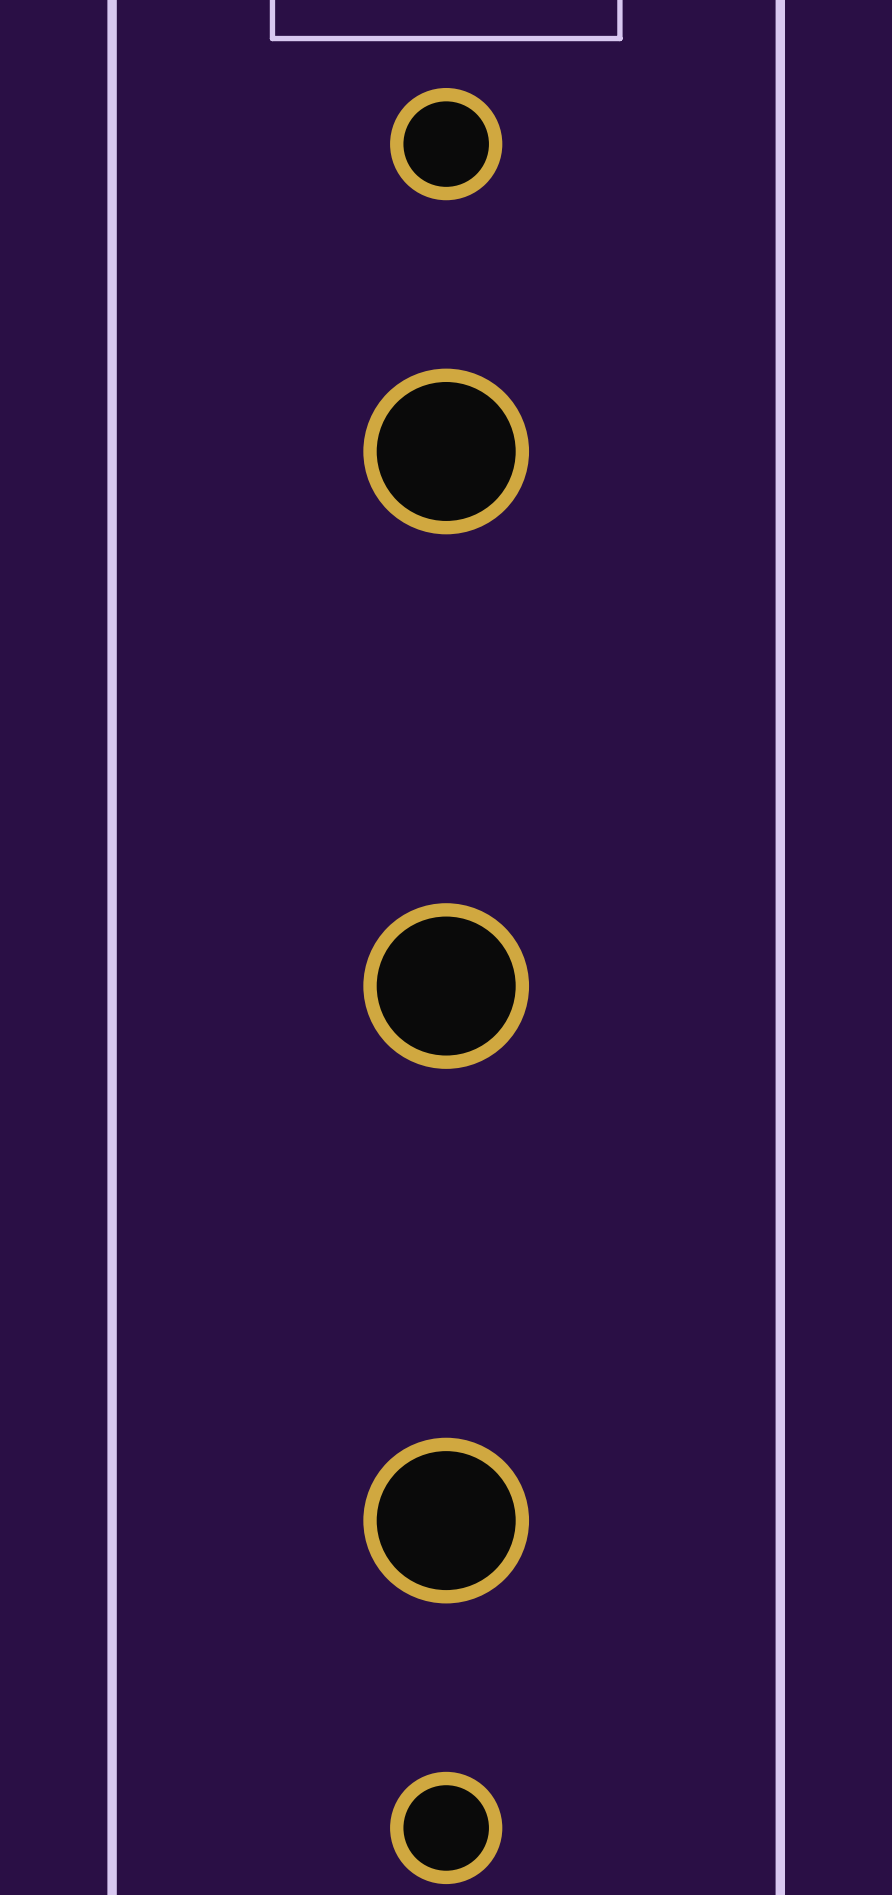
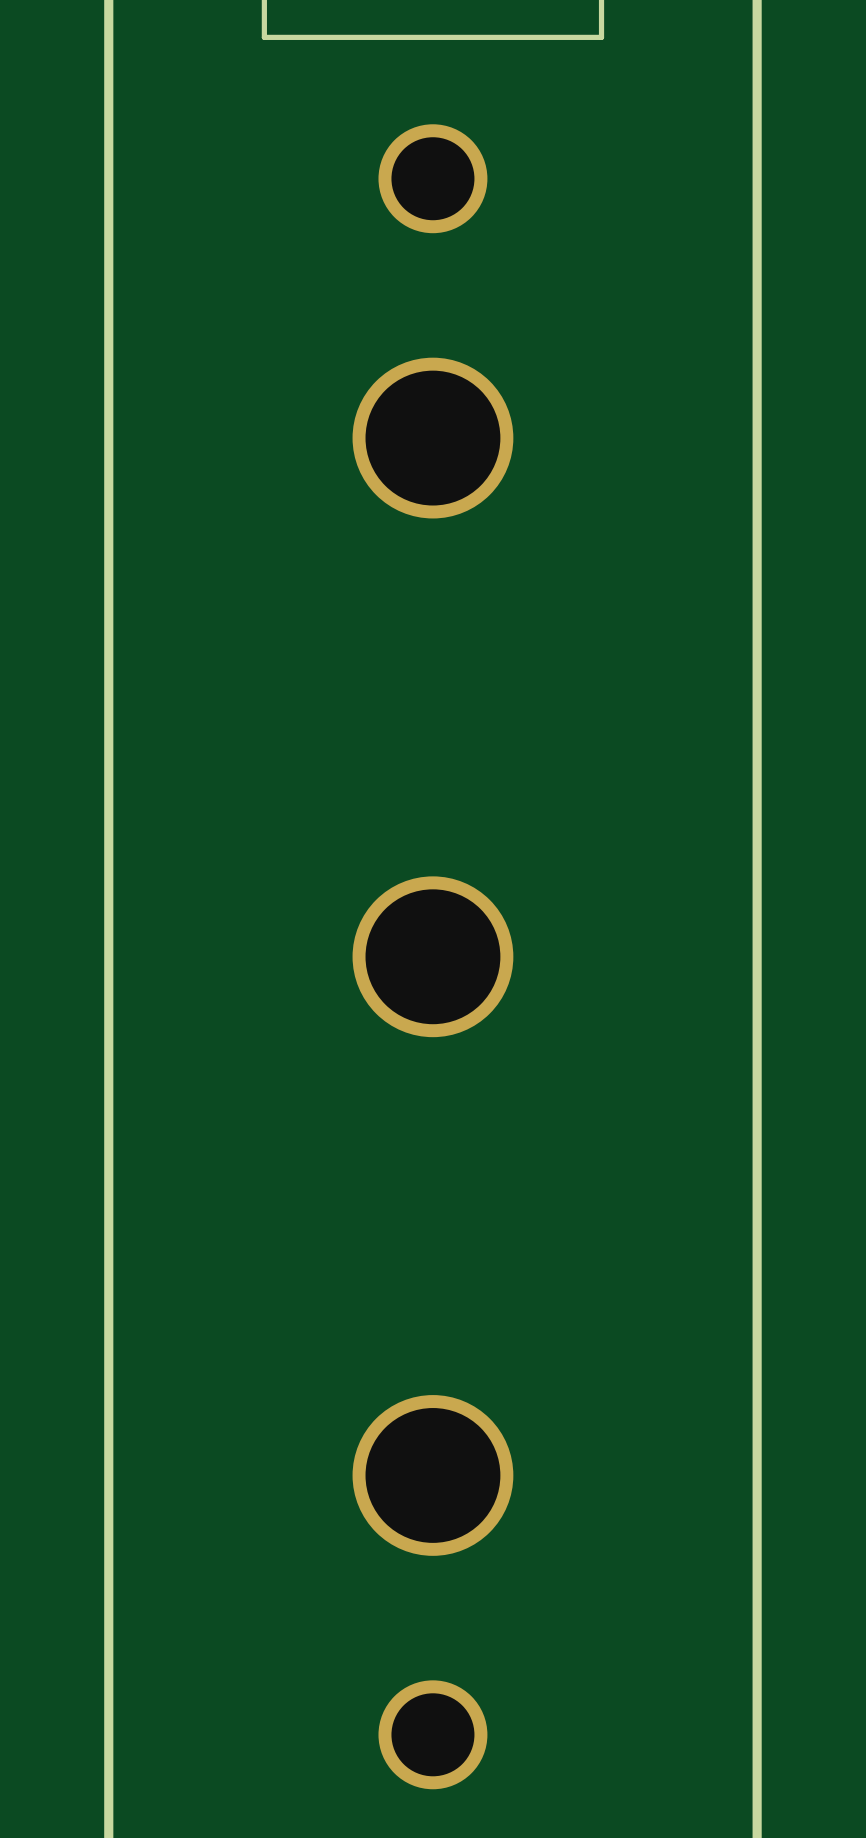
via position: (446, 144) -> (432, 178)
via position: (446, 1827) -> (432, 1734)

